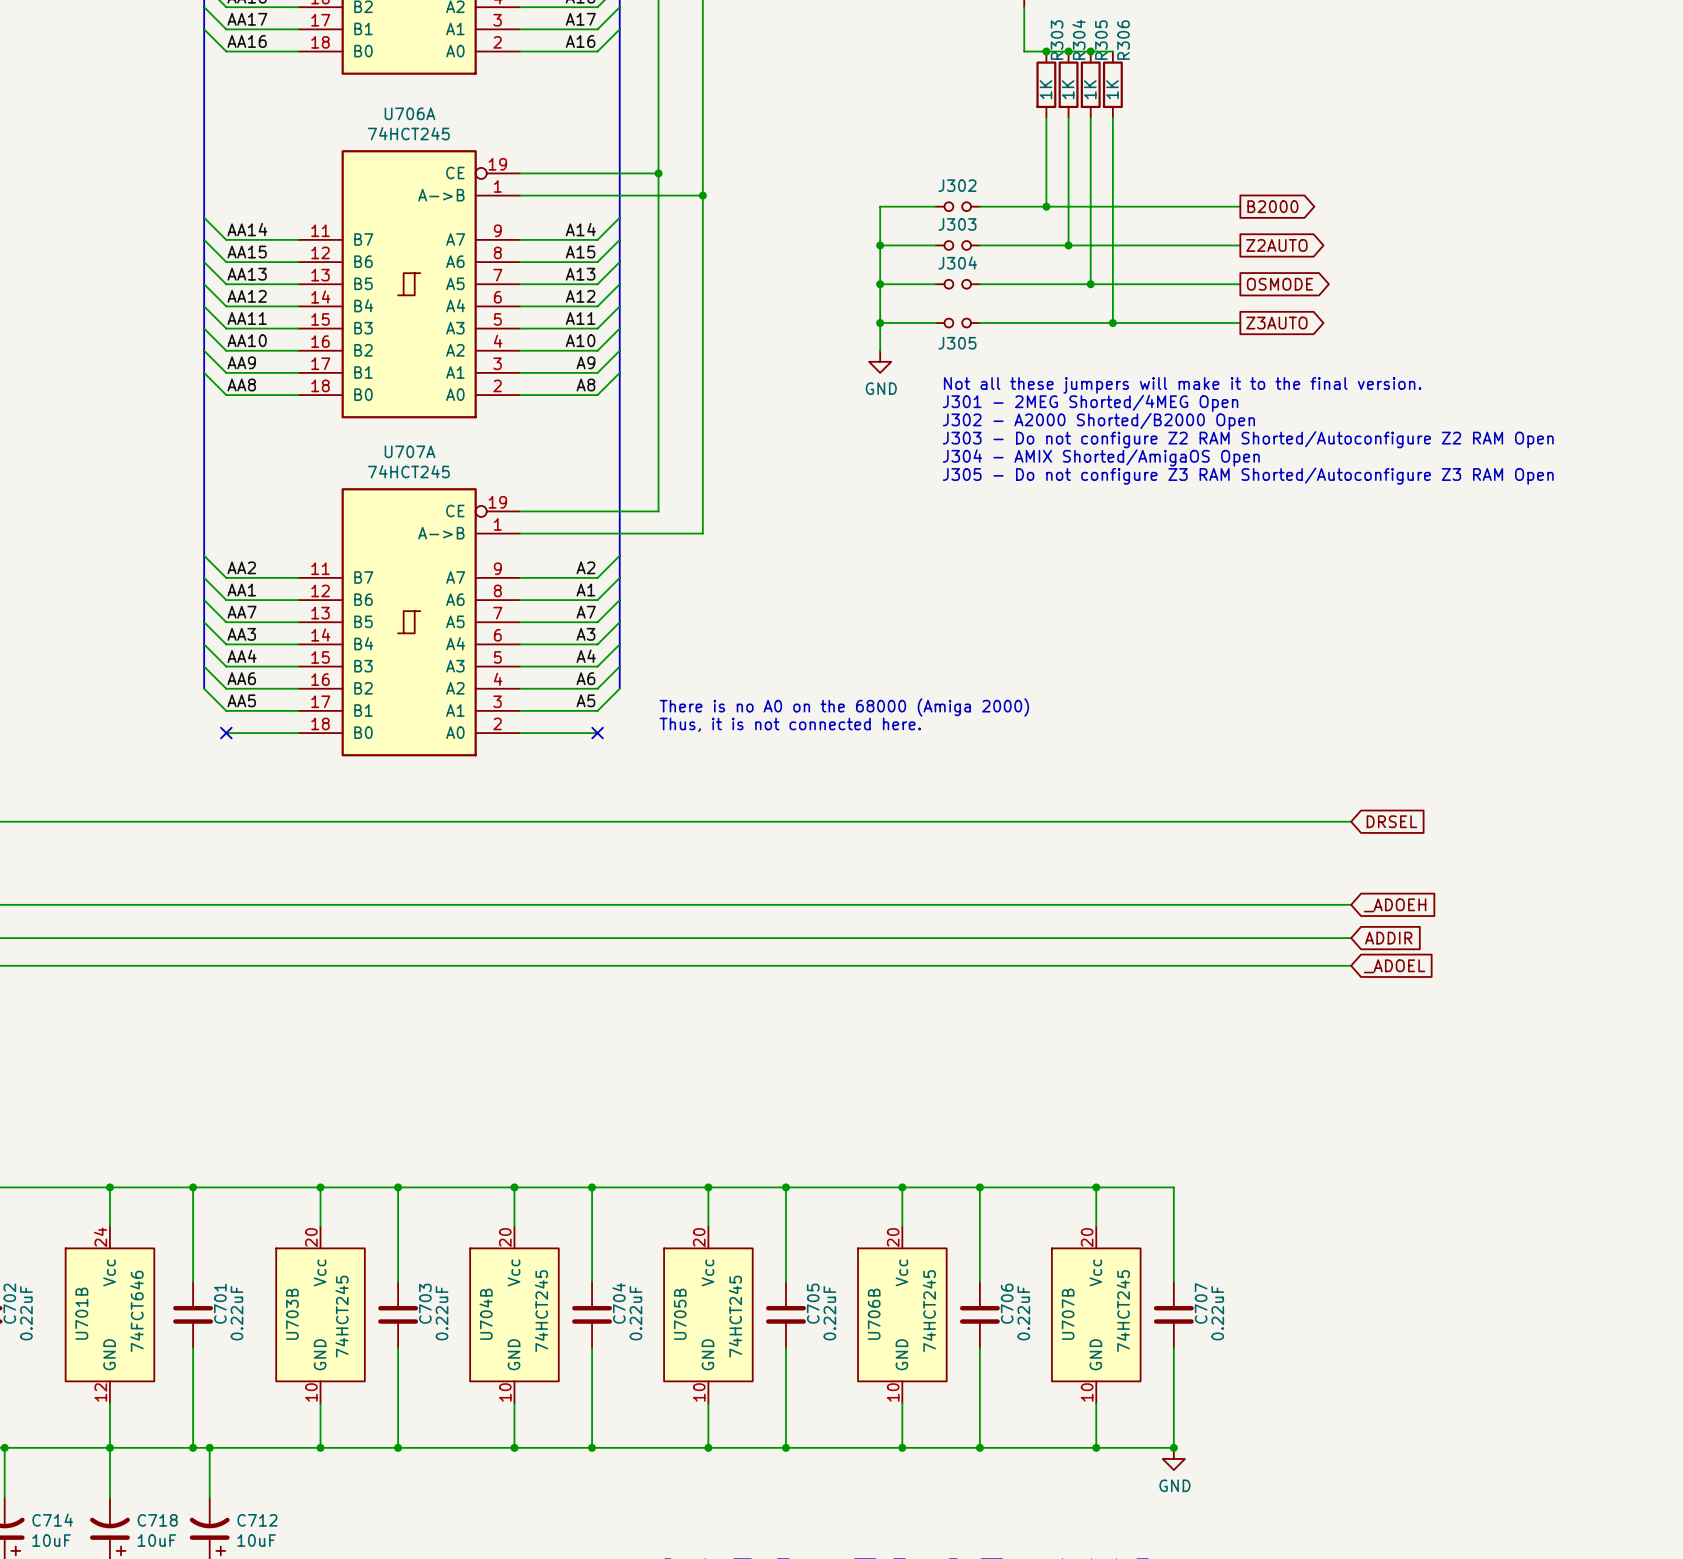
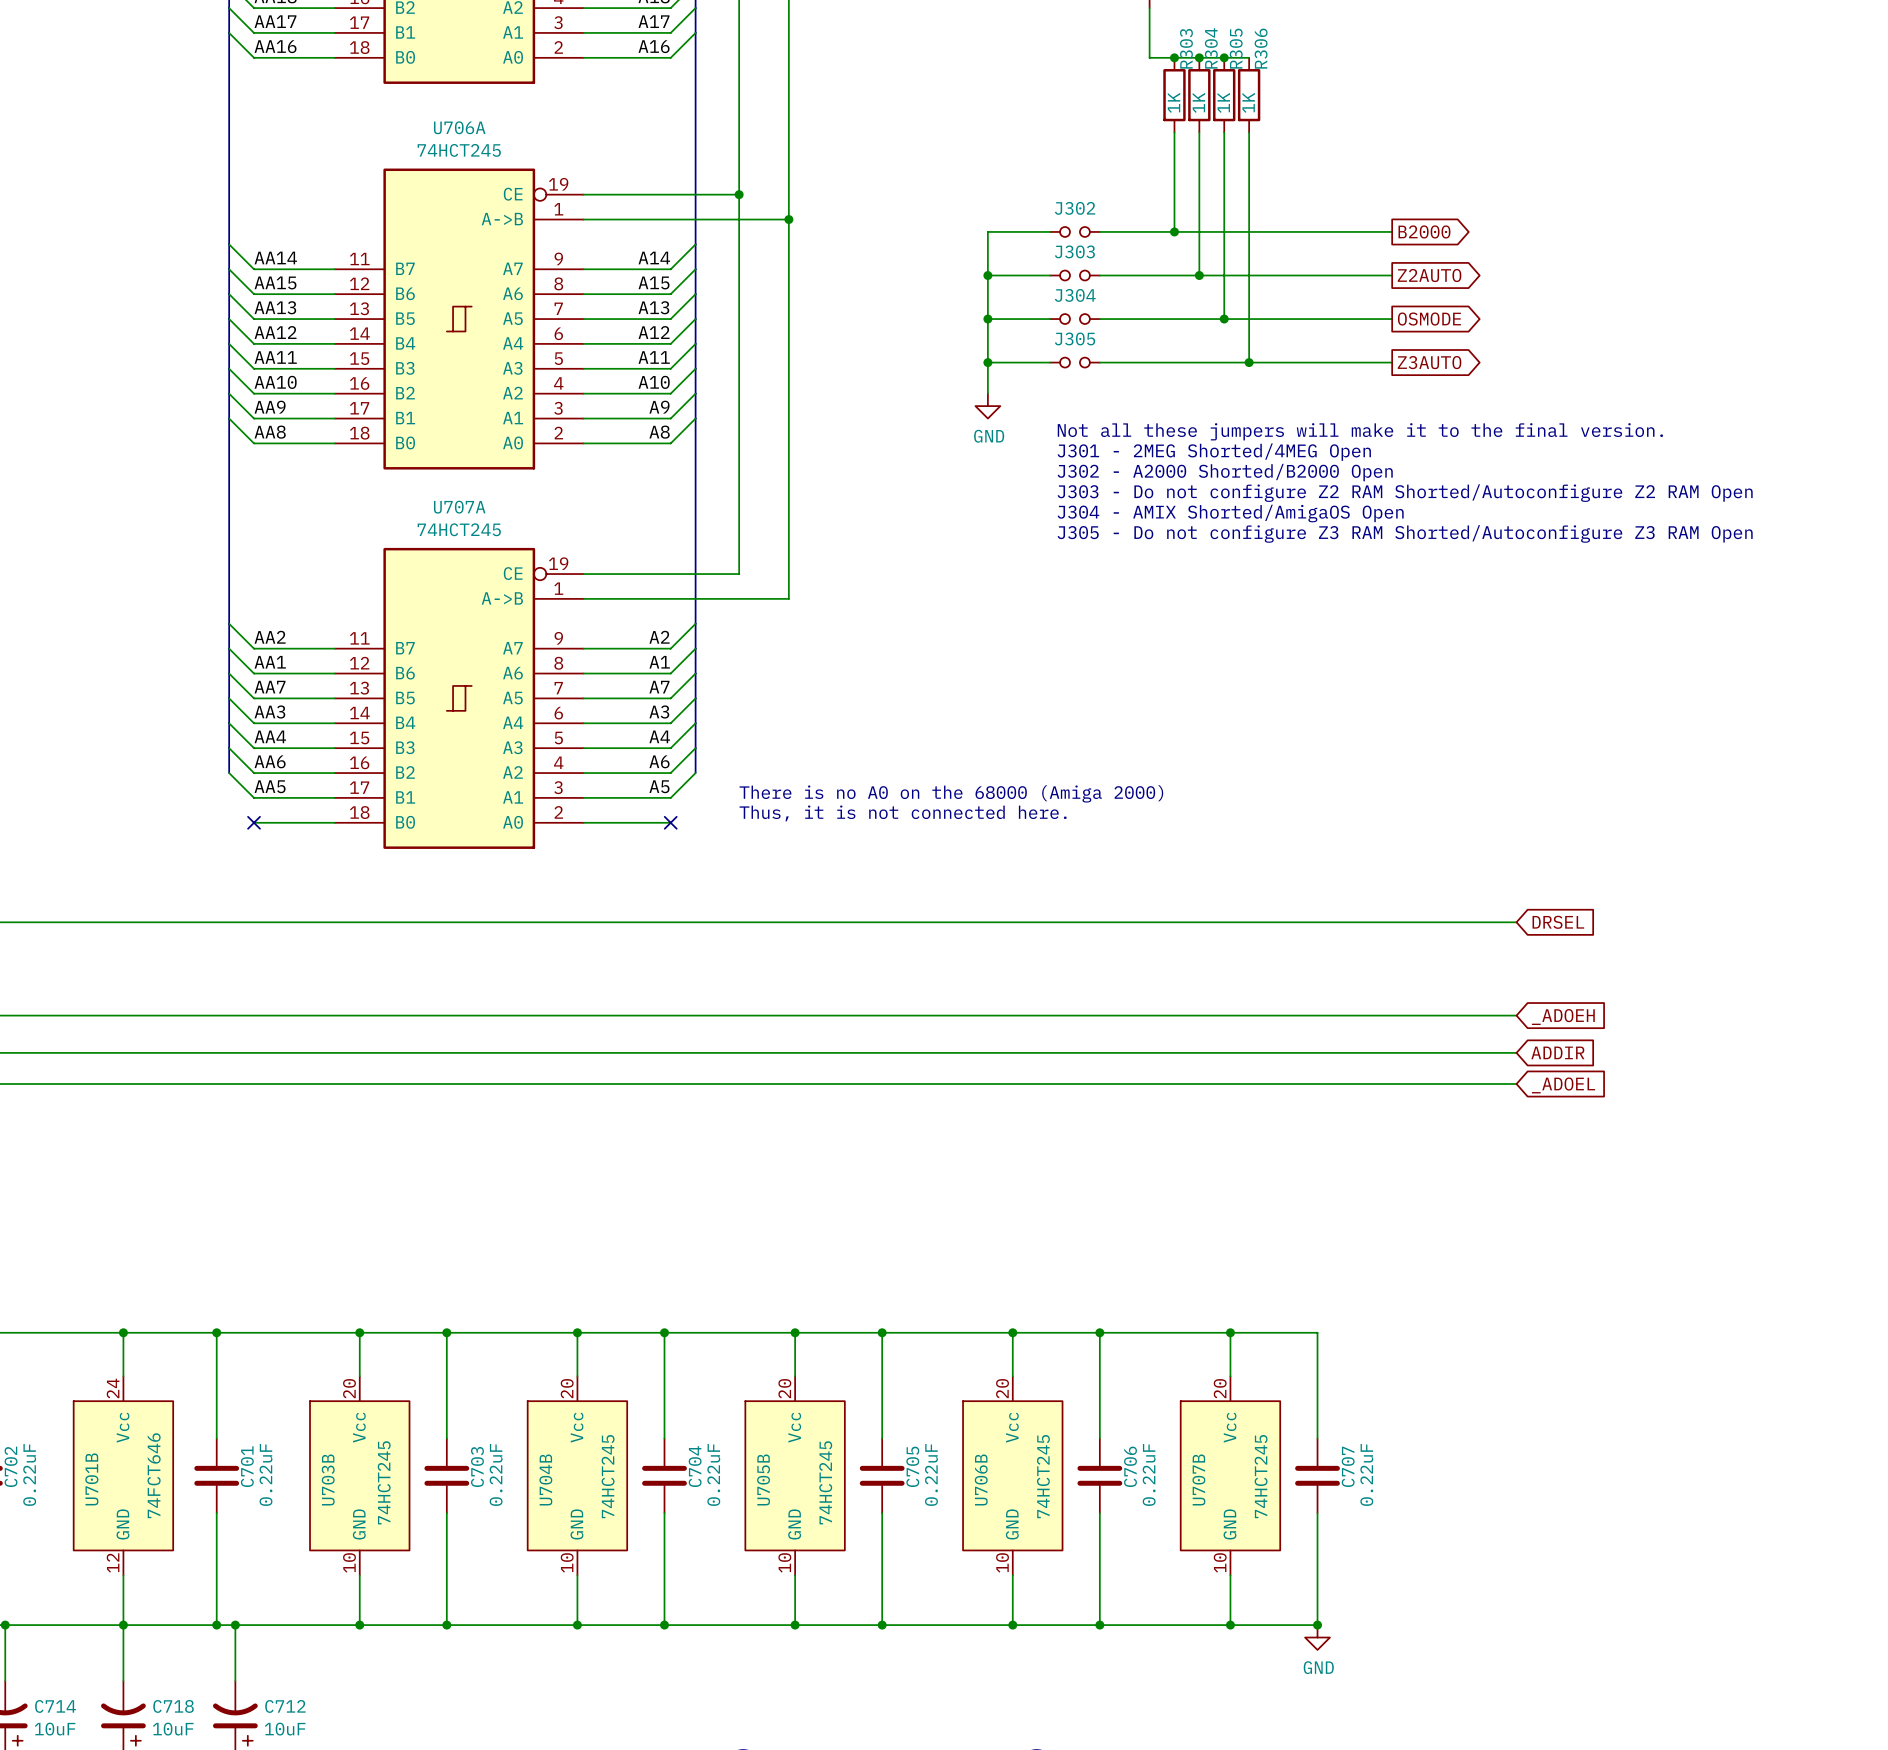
J305 name position: J305 (957, 343) -> J305 (1075, 338)

